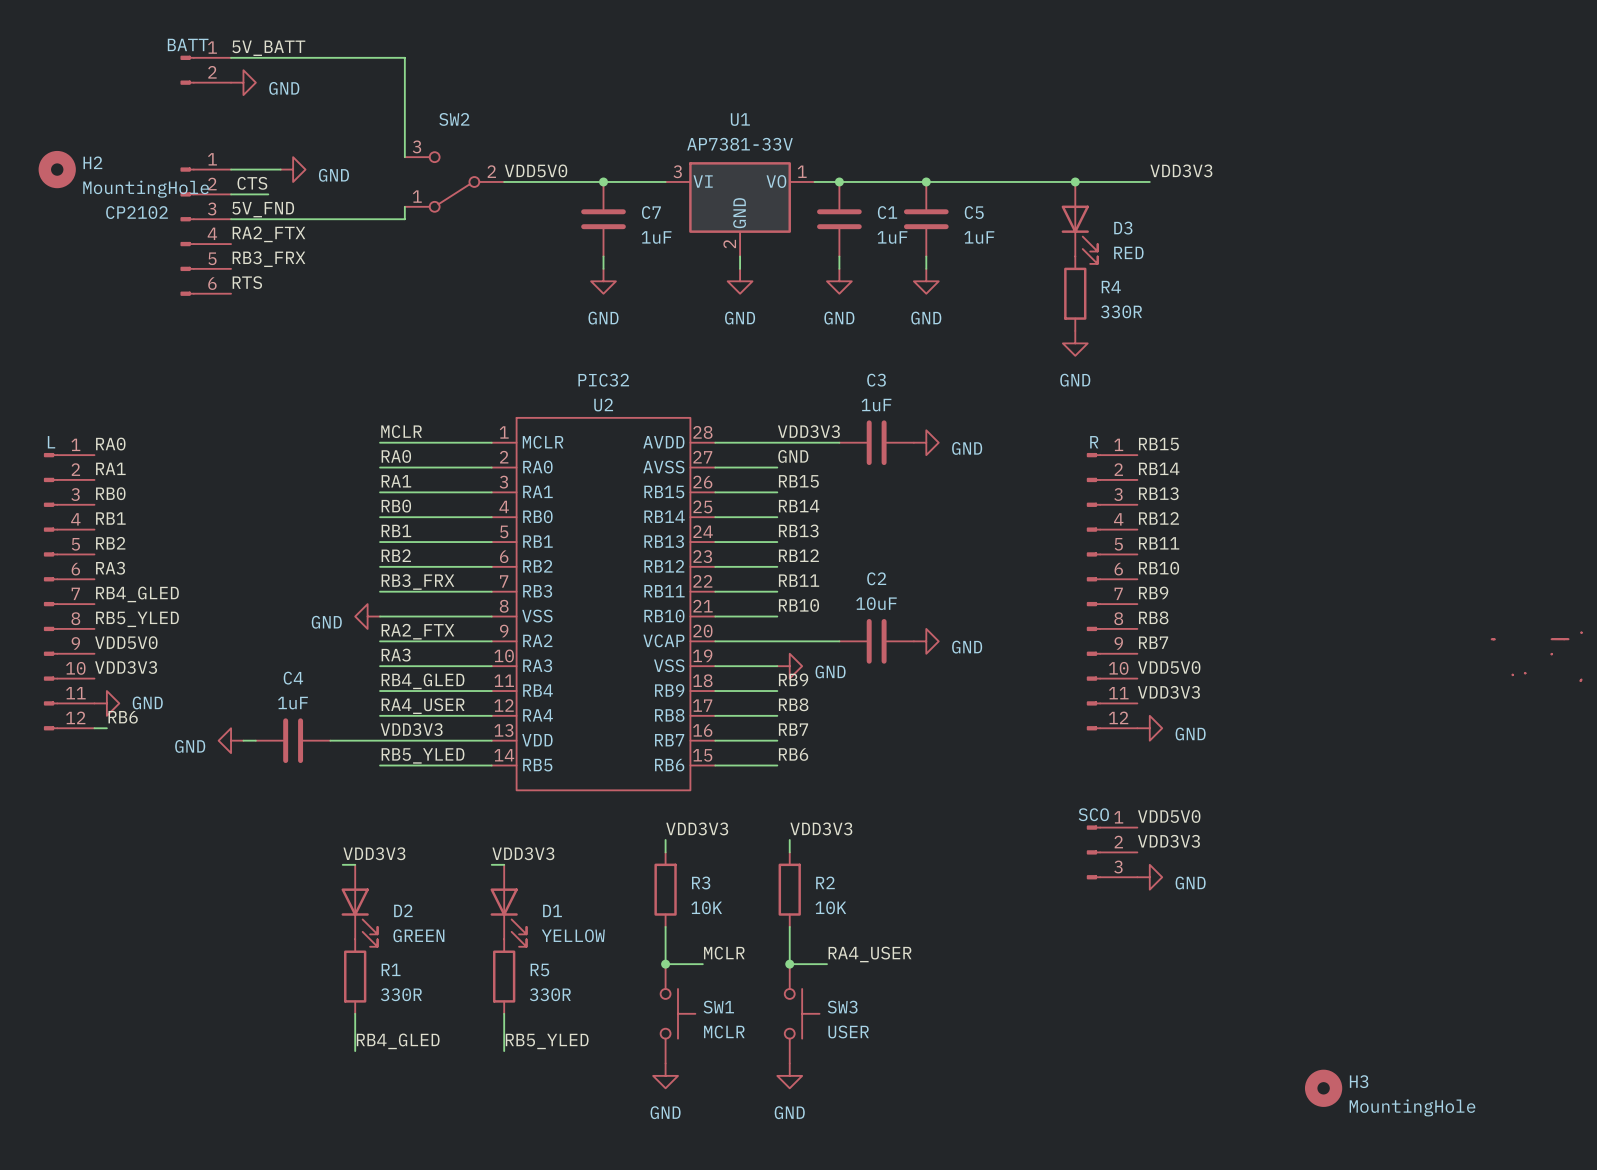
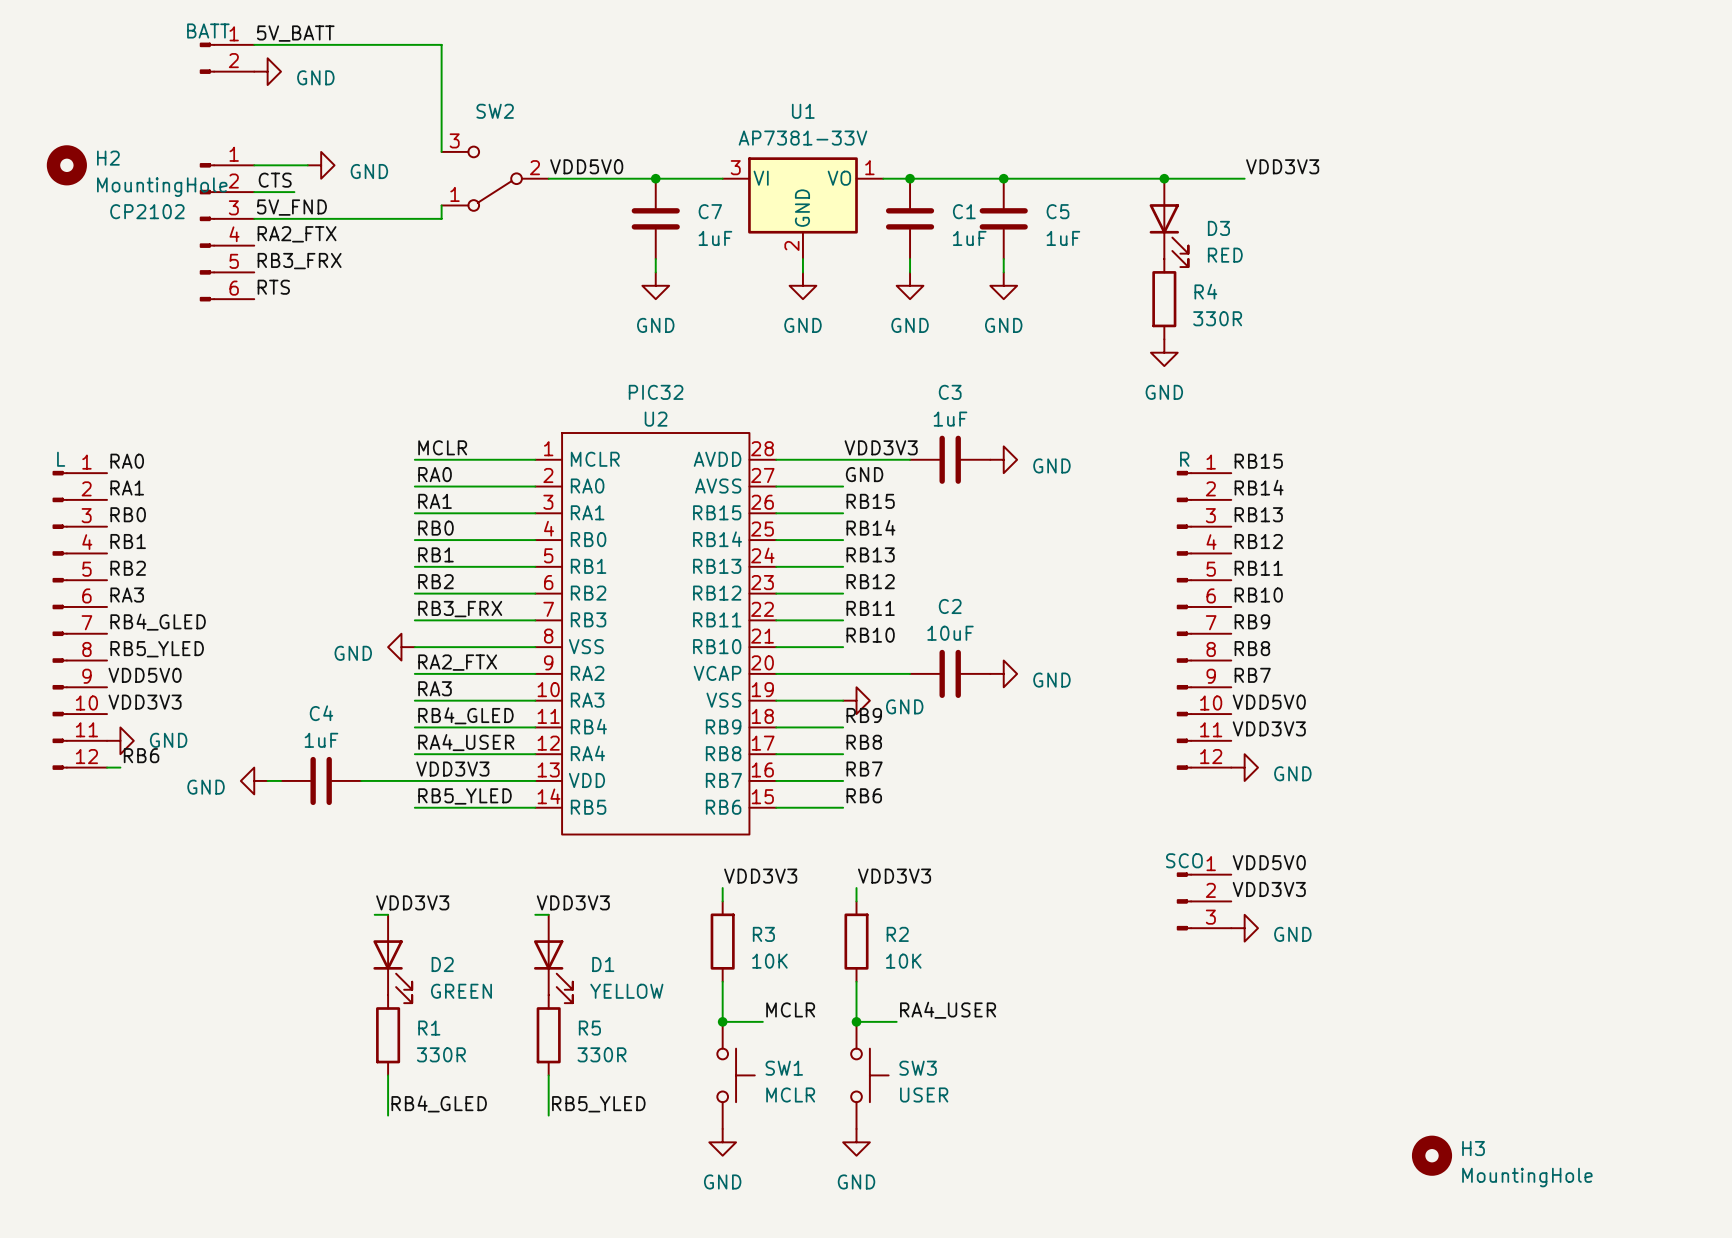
power symbol: (1536, 656) -> none

